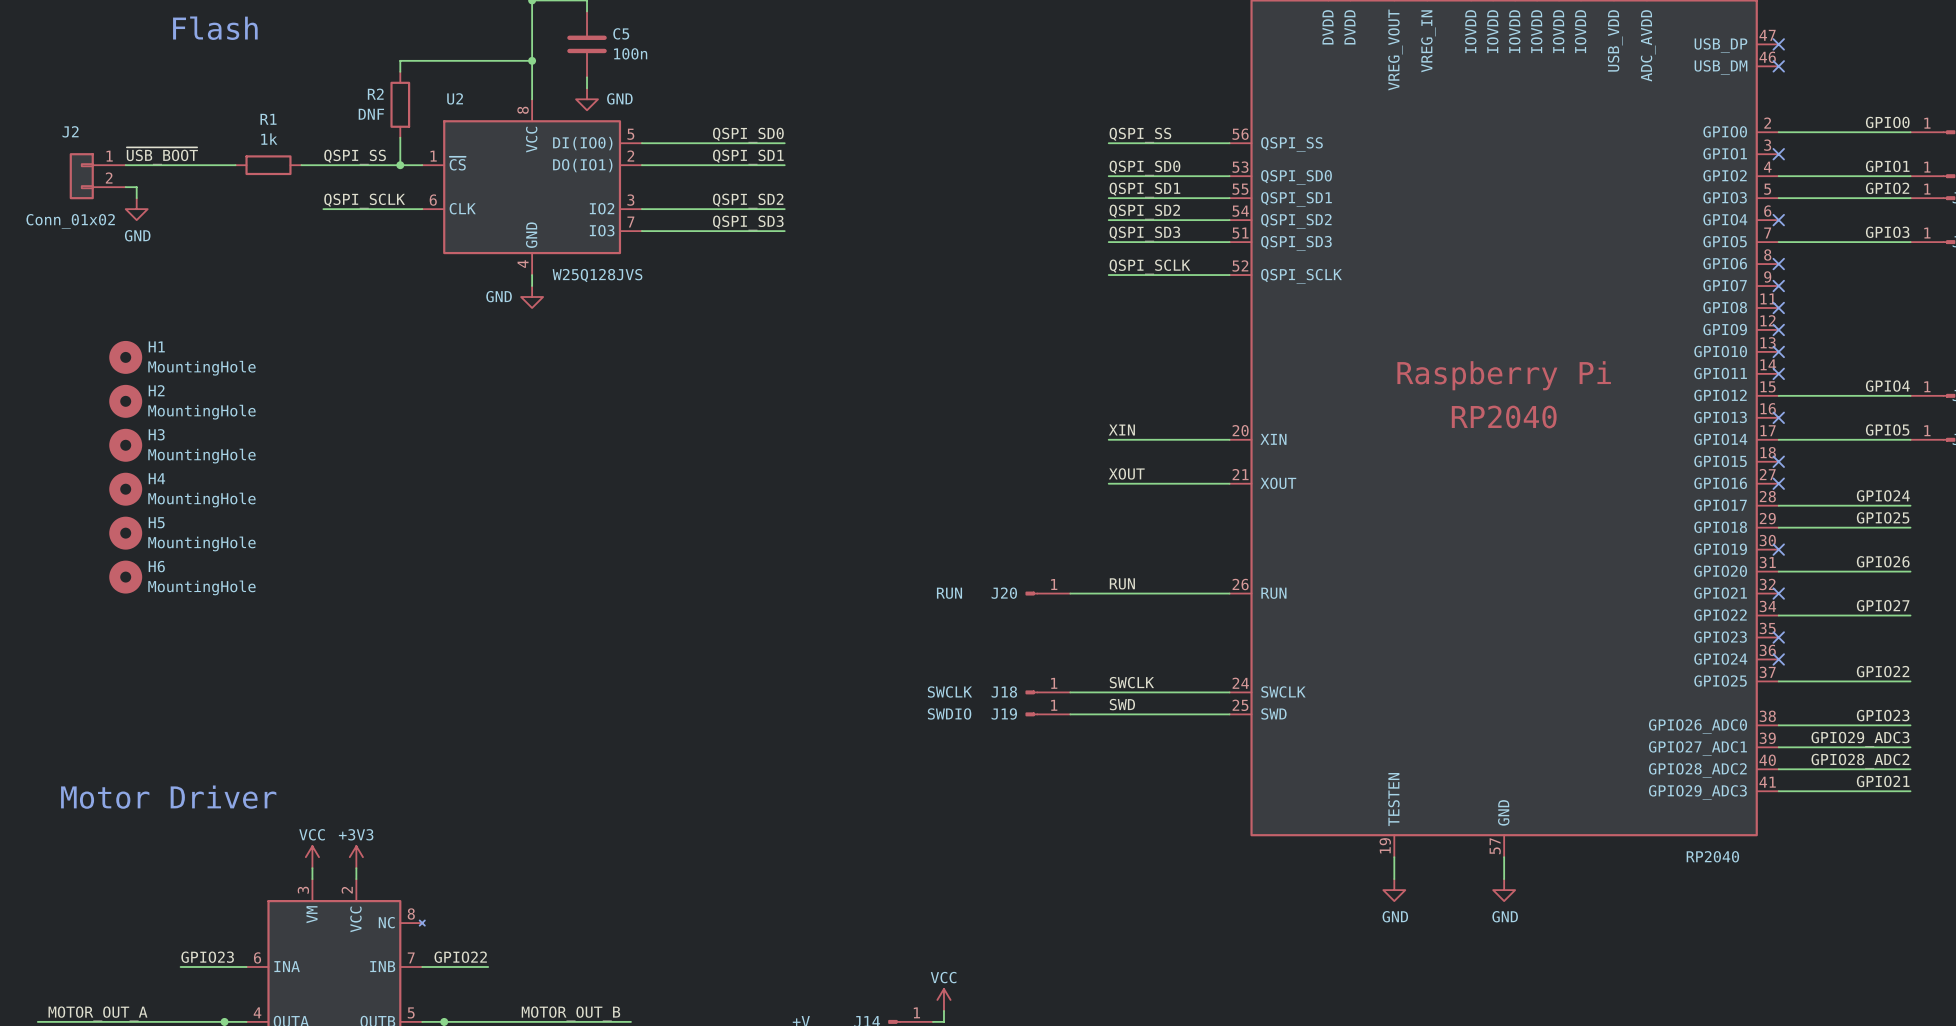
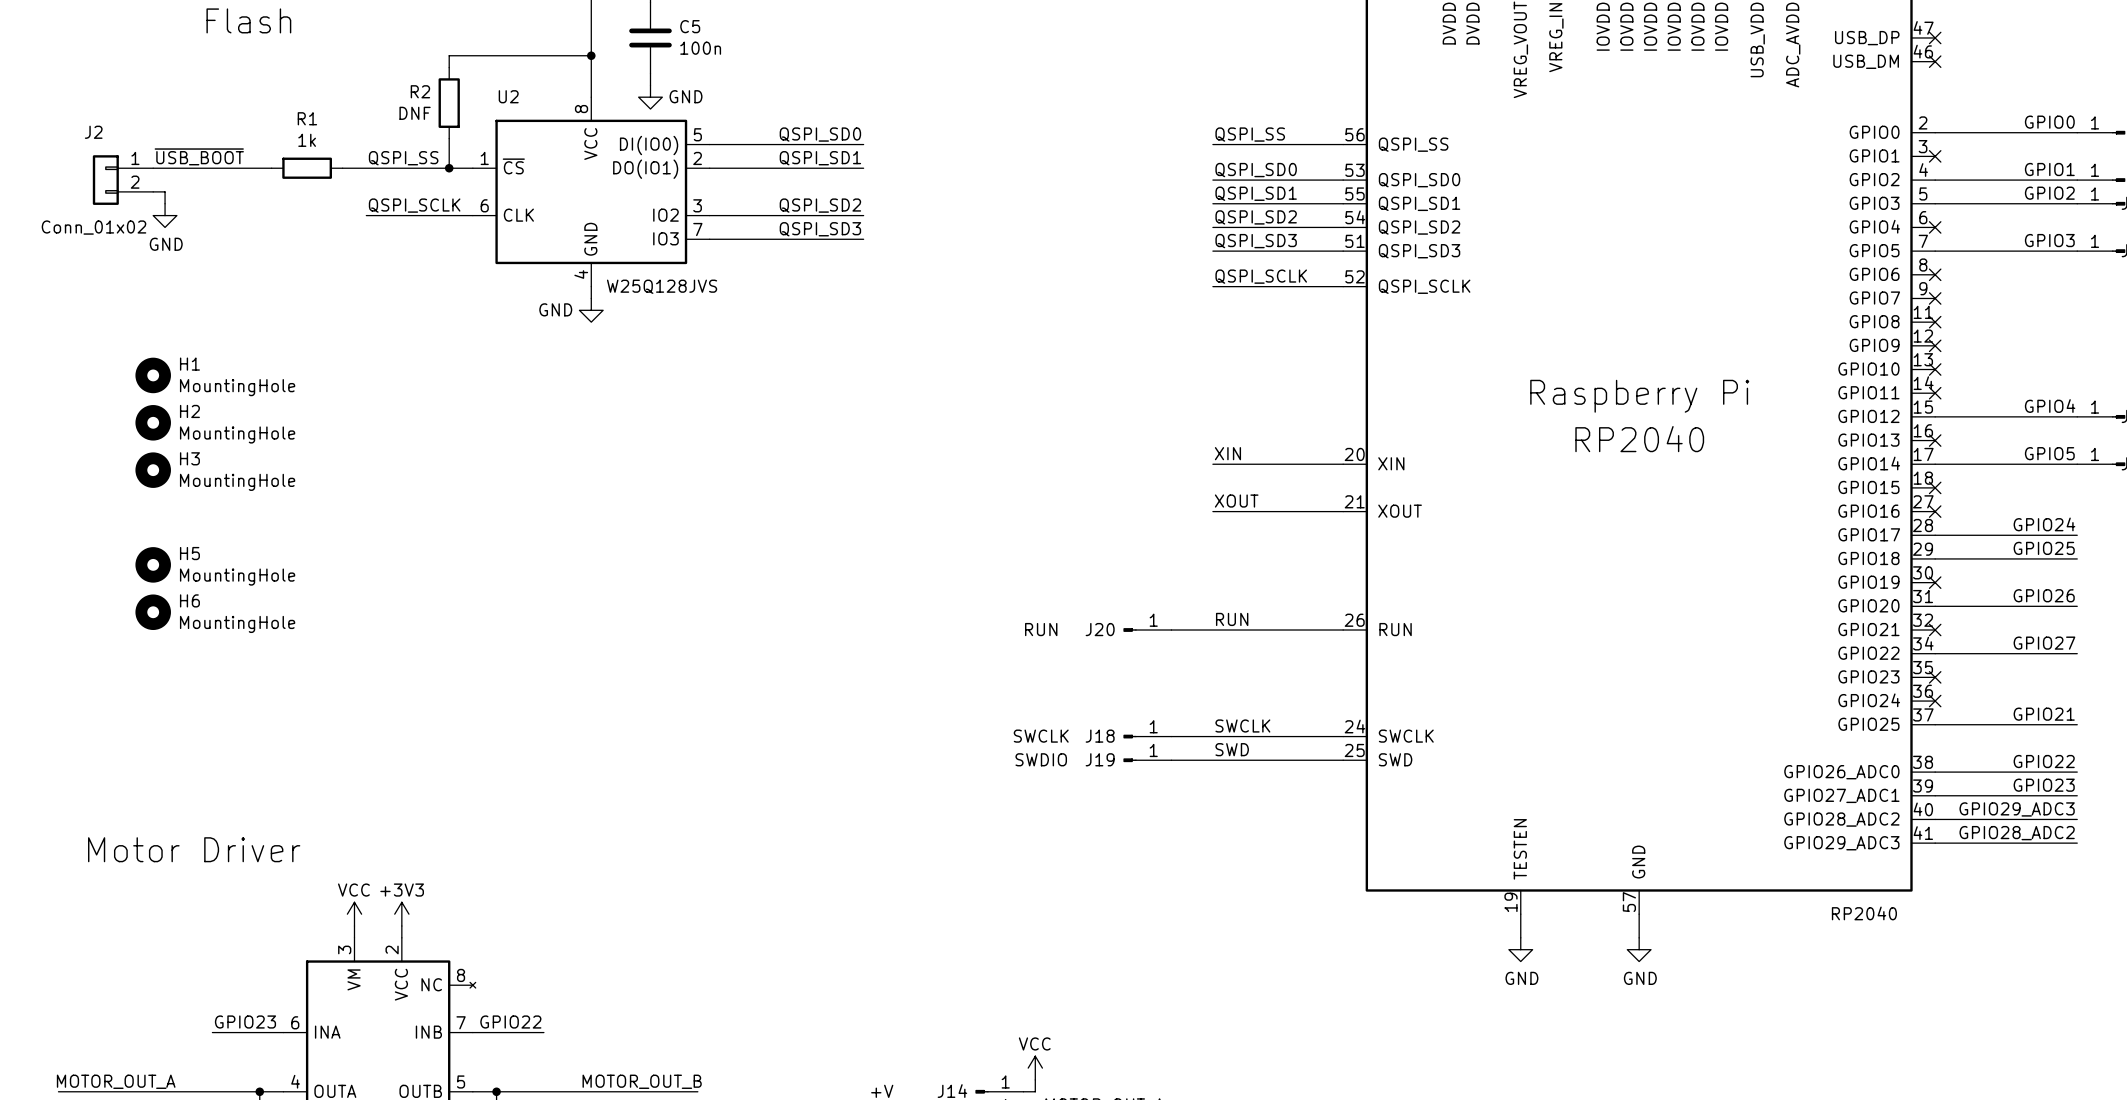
H4: MountingHole (125, 489) -> none
label: GPIO22 (1883, 671) -> GPIO21 (2044, 714)
label: GPIO23 (1883, 715) -> GPIO22 (2044, 761)
label: GPIO29_ADC3 (1860, 739) -> GPIO23 (2044, 785)
label: GPIO28_ADC2 (1860, 761) -> GPIO29_ADC3 (2017, 809)
label: GPIO21 (1883, 781) -> GPIO28_ADC2 (2017, 833)

